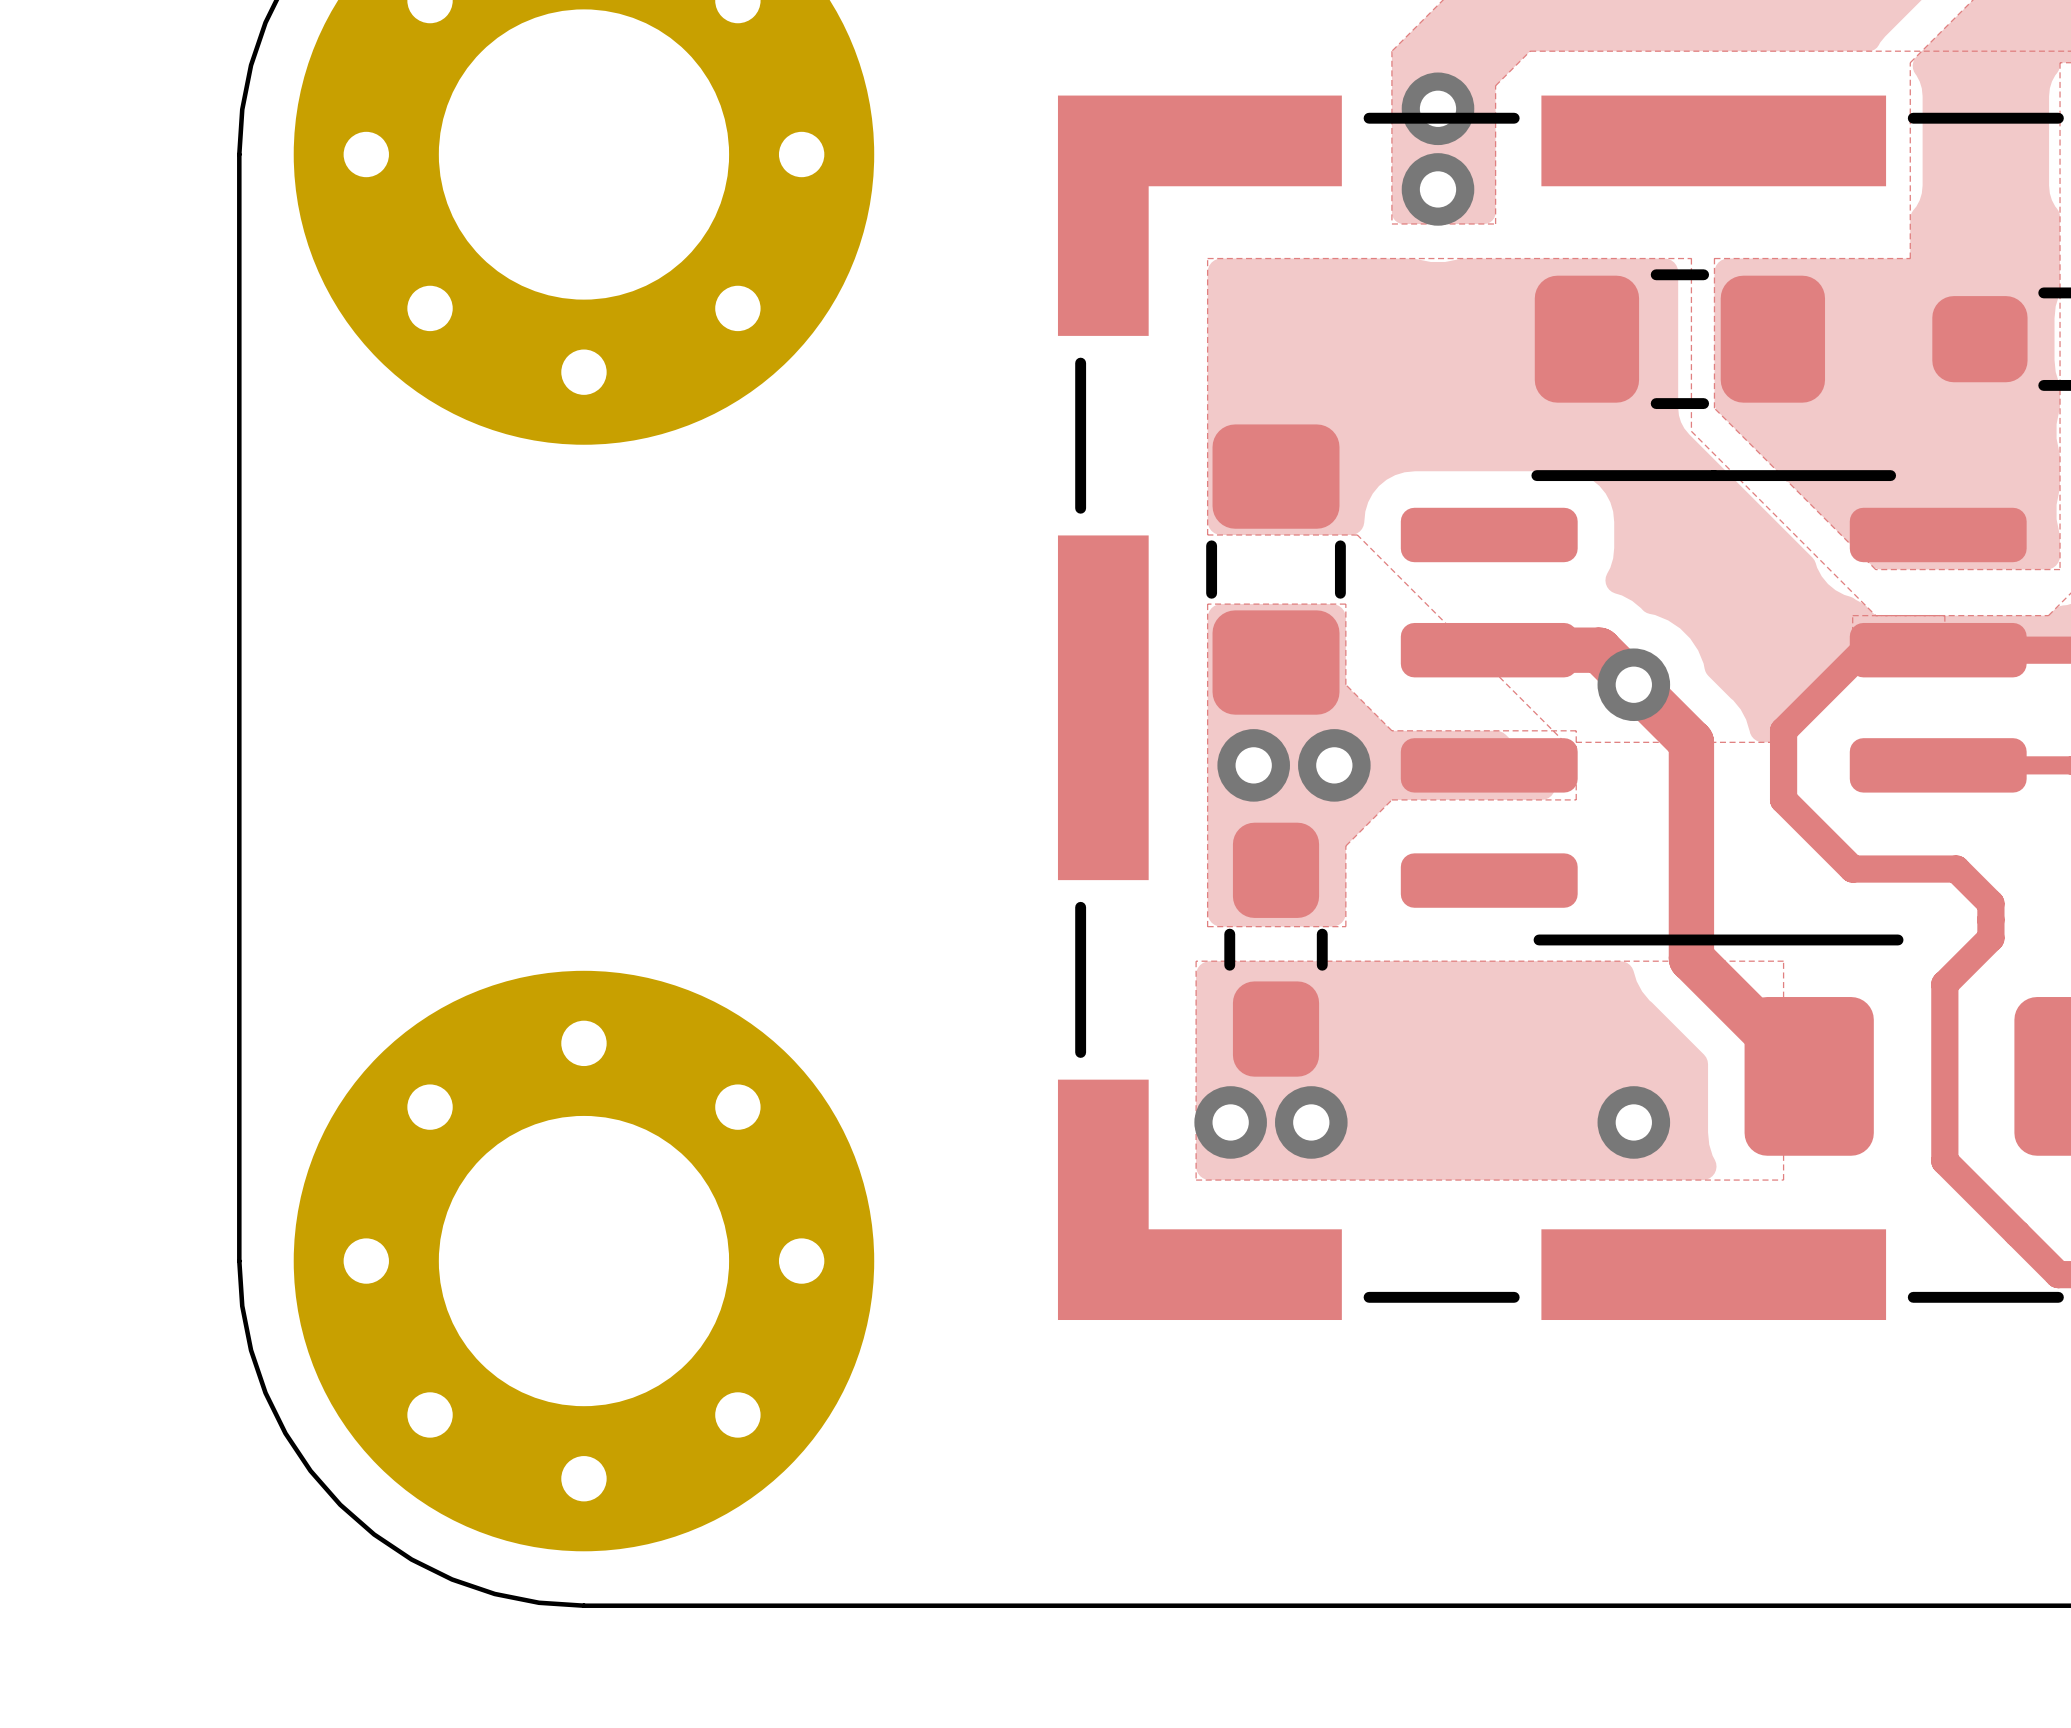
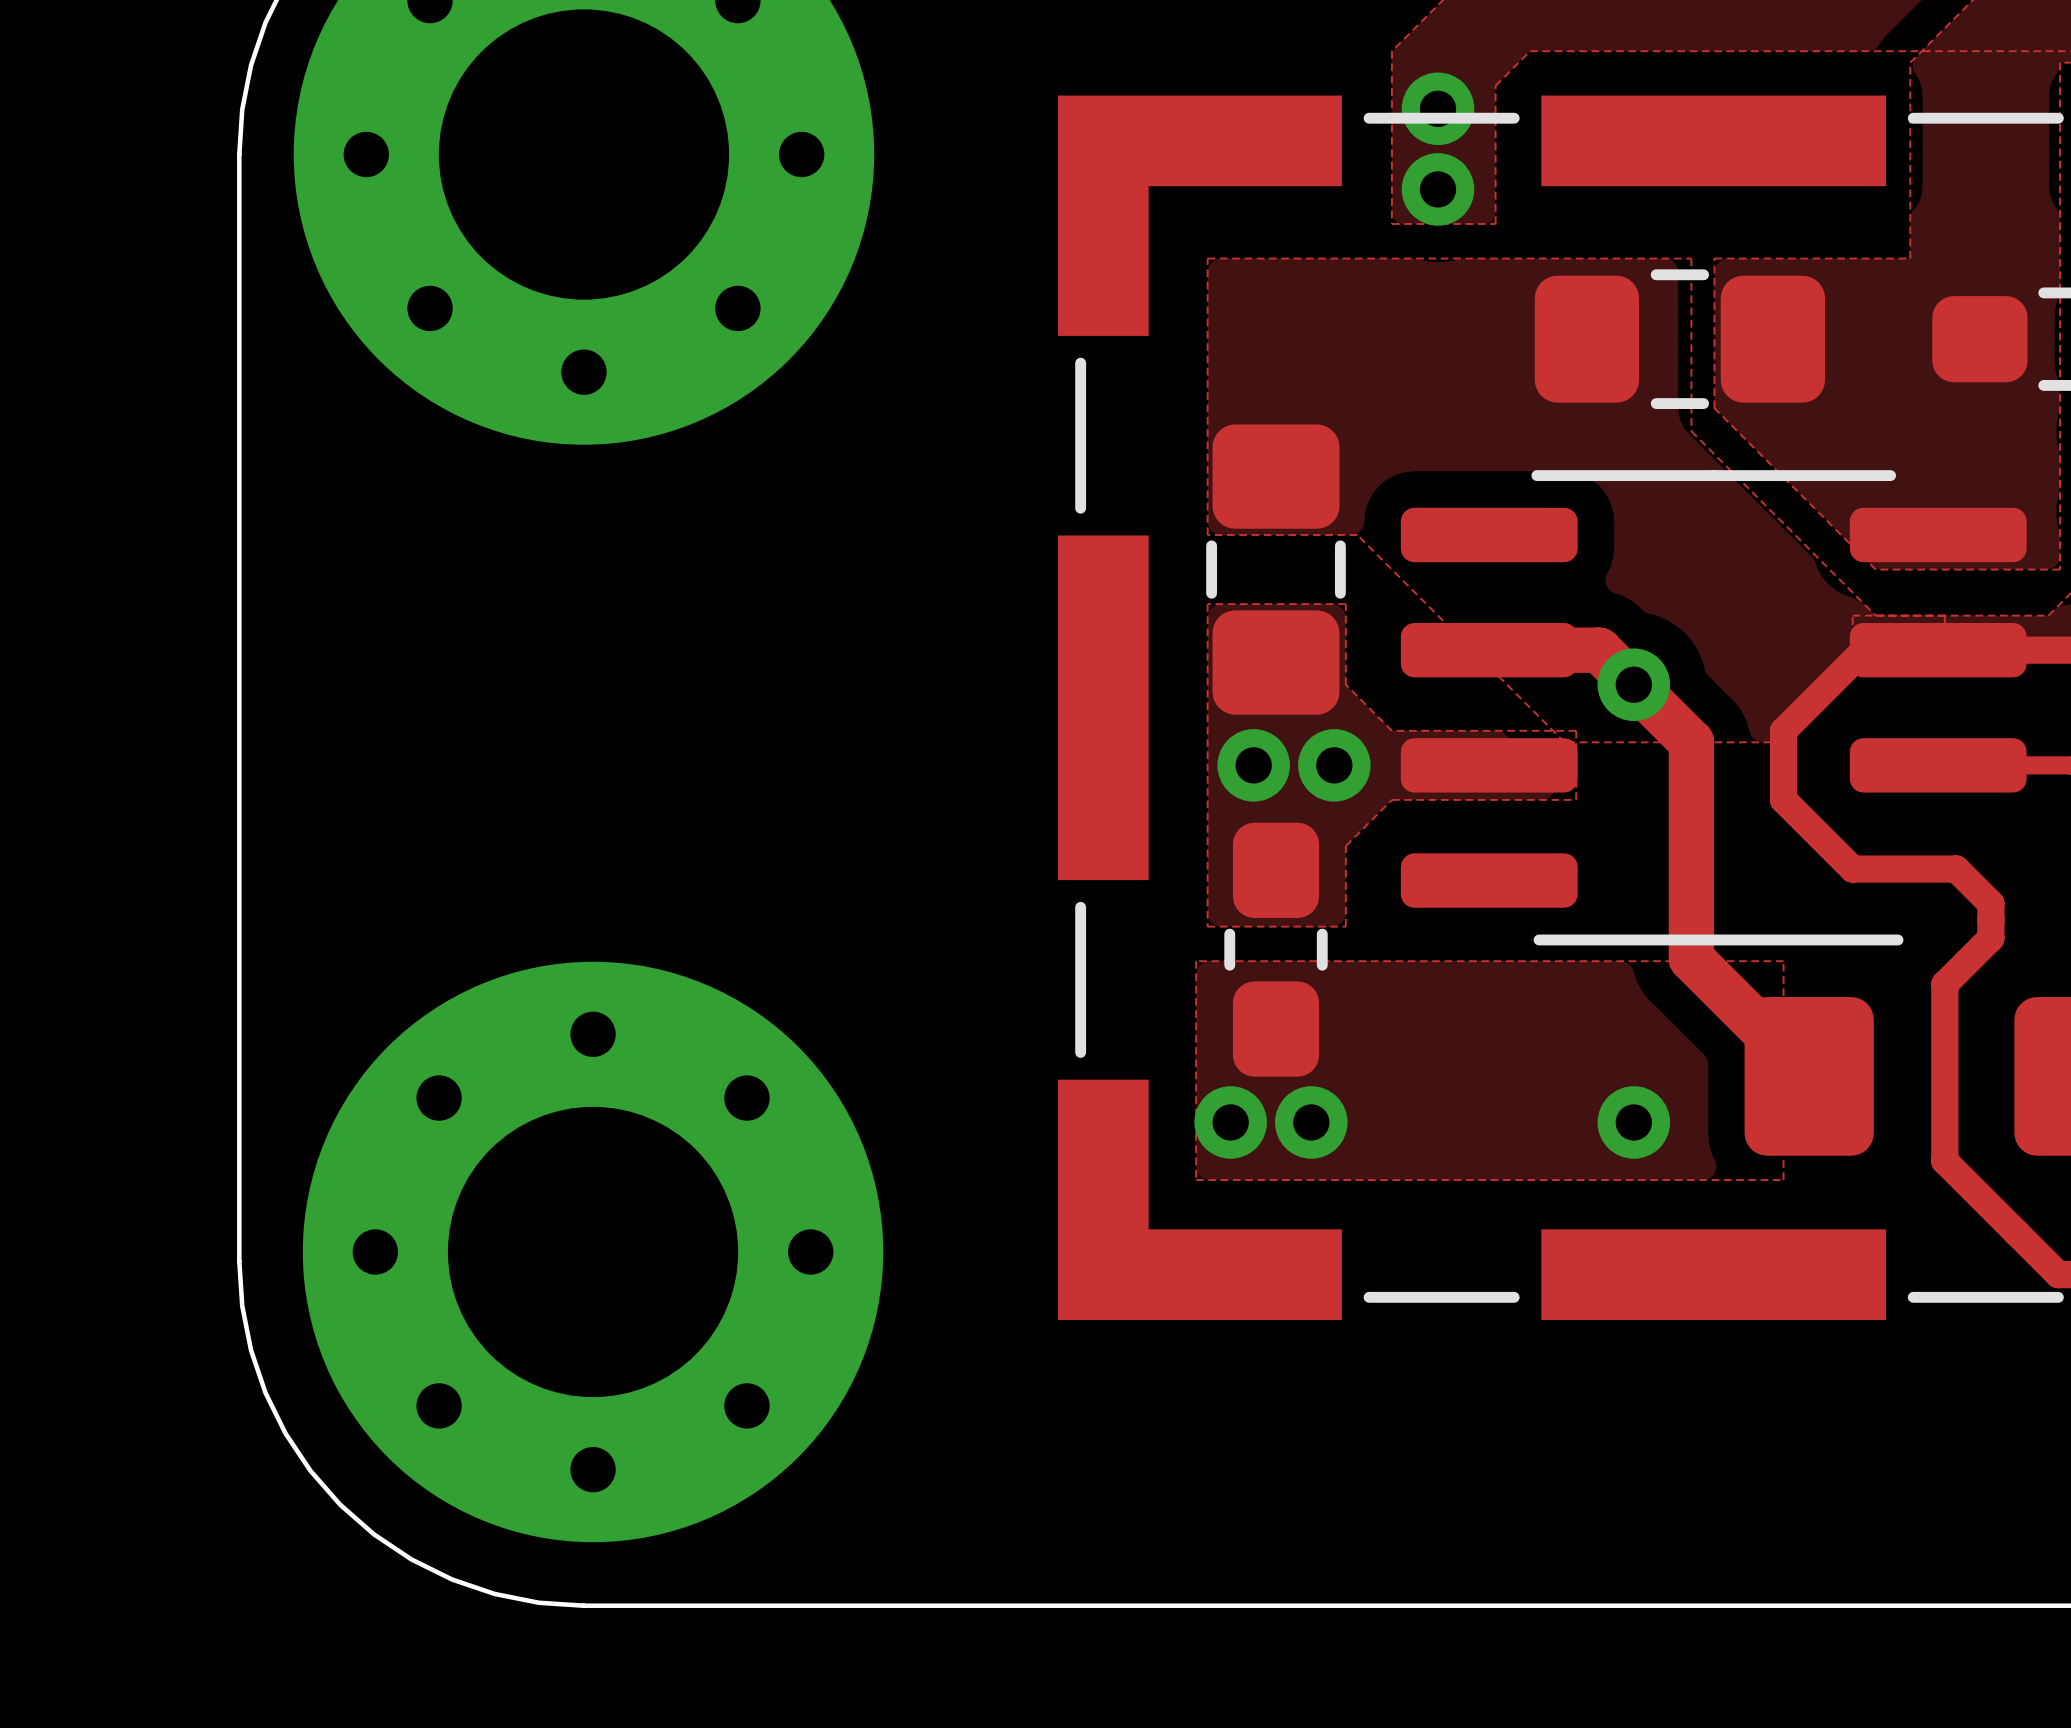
part position: (583, 1261) -> (593, 1251)

